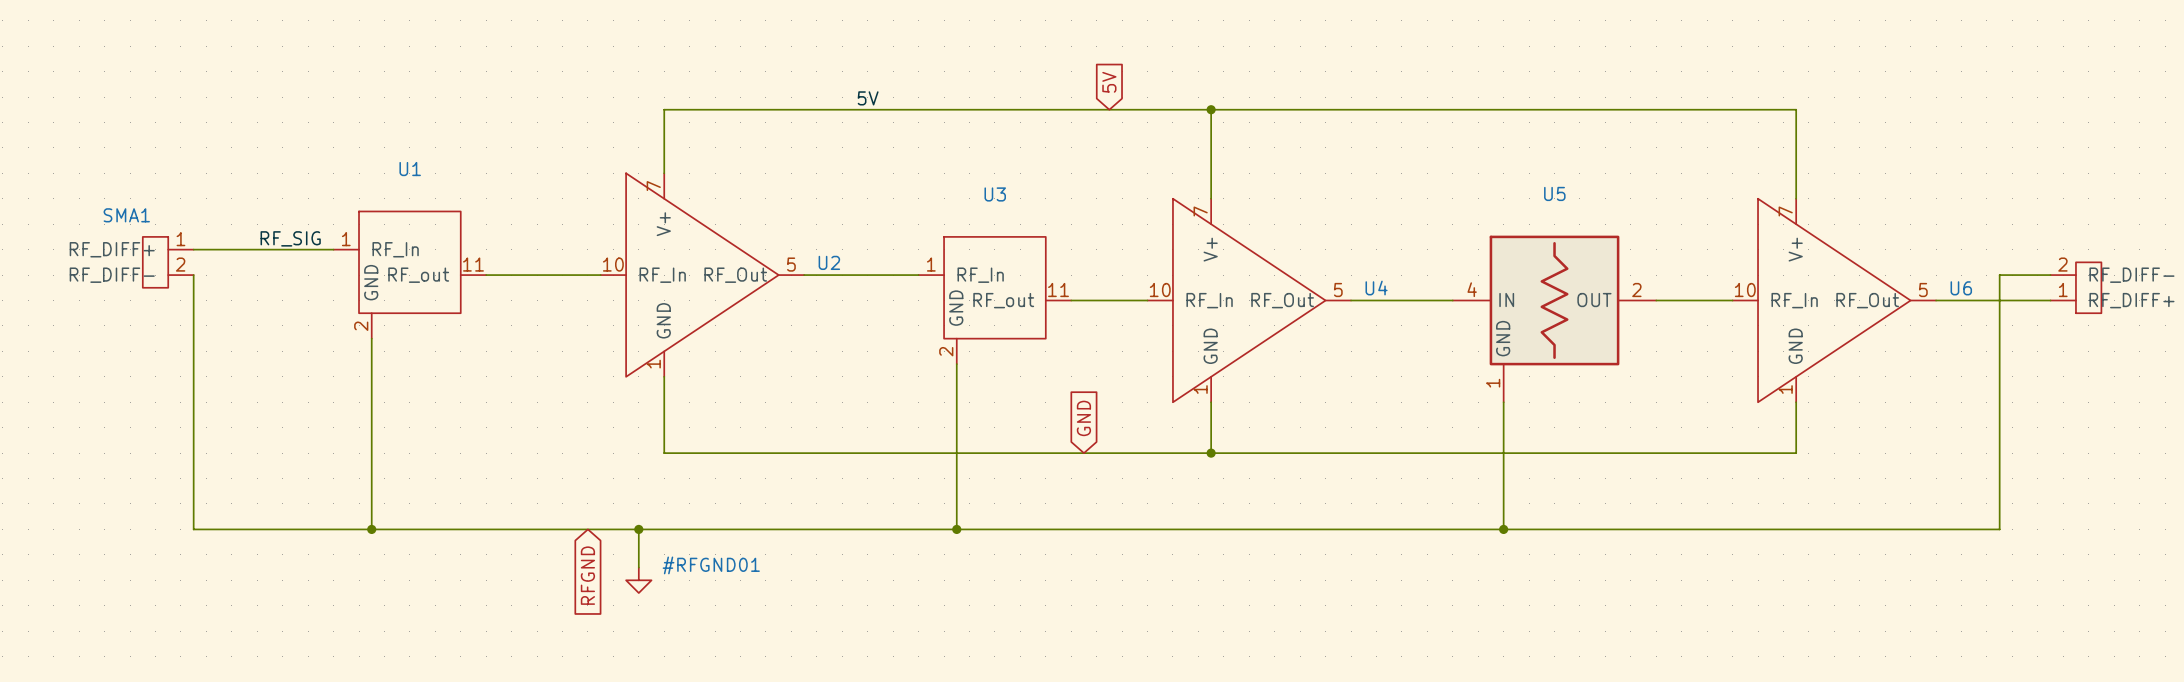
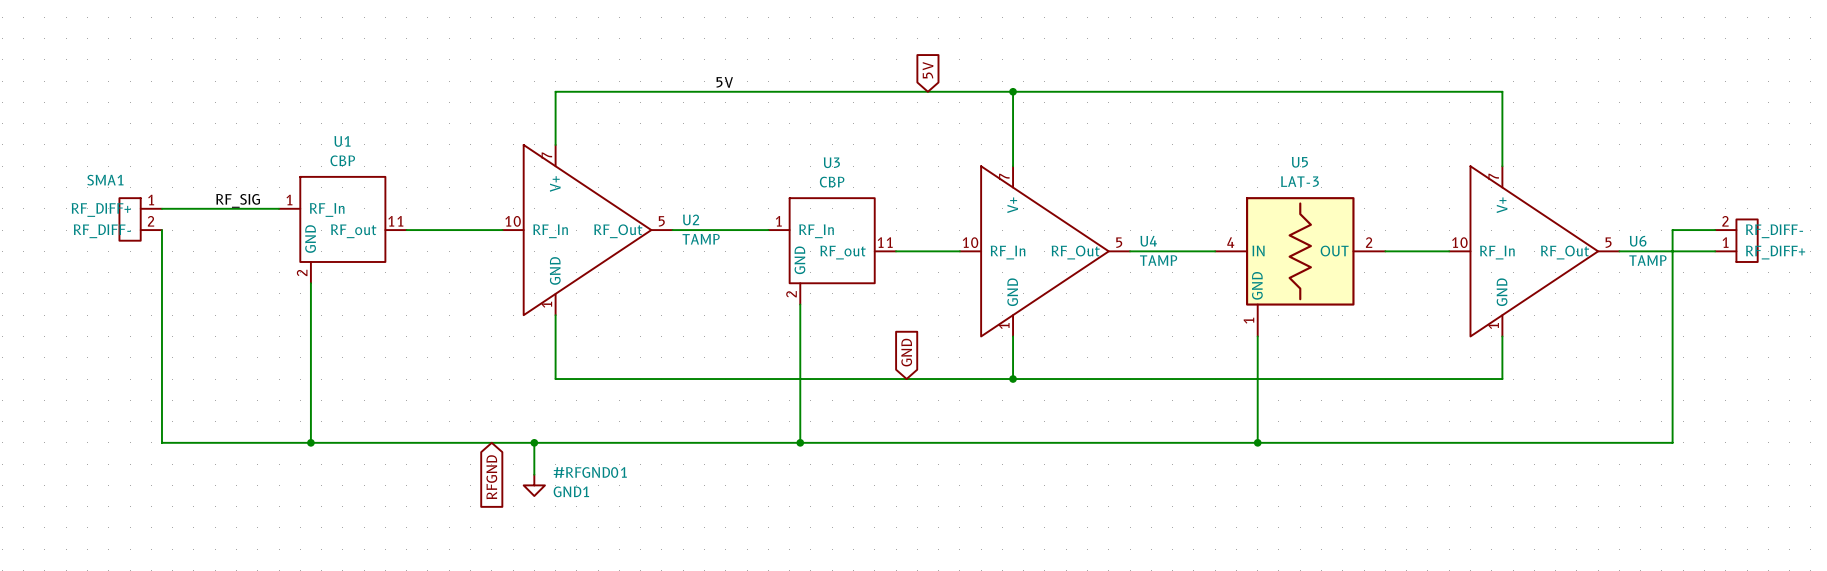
U1 value: none -> CBP (342, 160)
U3 value: none -> CBP (832, 182)
U5 value: none -> LAT-3 (1299, 181)
U2 value: none -> TAMP (701, 239)
U4 value: none -> TAMP (1158, 260)
U6 value: none -> TAMP (1647, 260)
#RFGND01 text: none -> GND1 (571, 491)

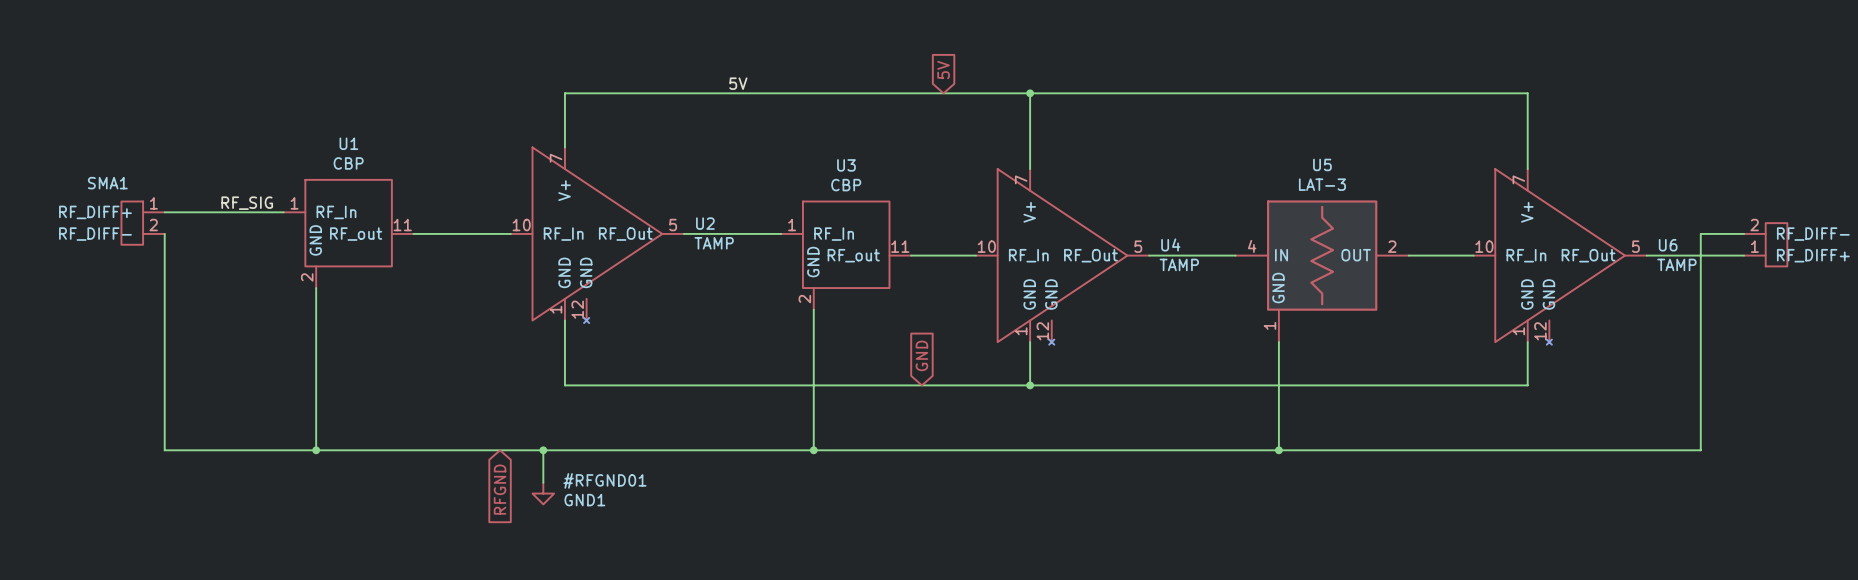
U2 symbol: [502, 144, 673, 316] -> [510, 147, 684, 324]
U4 symbol: [959, 166, 1131, 337] -> [976, 169, 1150, 345]
U6 symbol: [1449, 166, 1620, 337] -> [1473, 169, 1647, 345]

